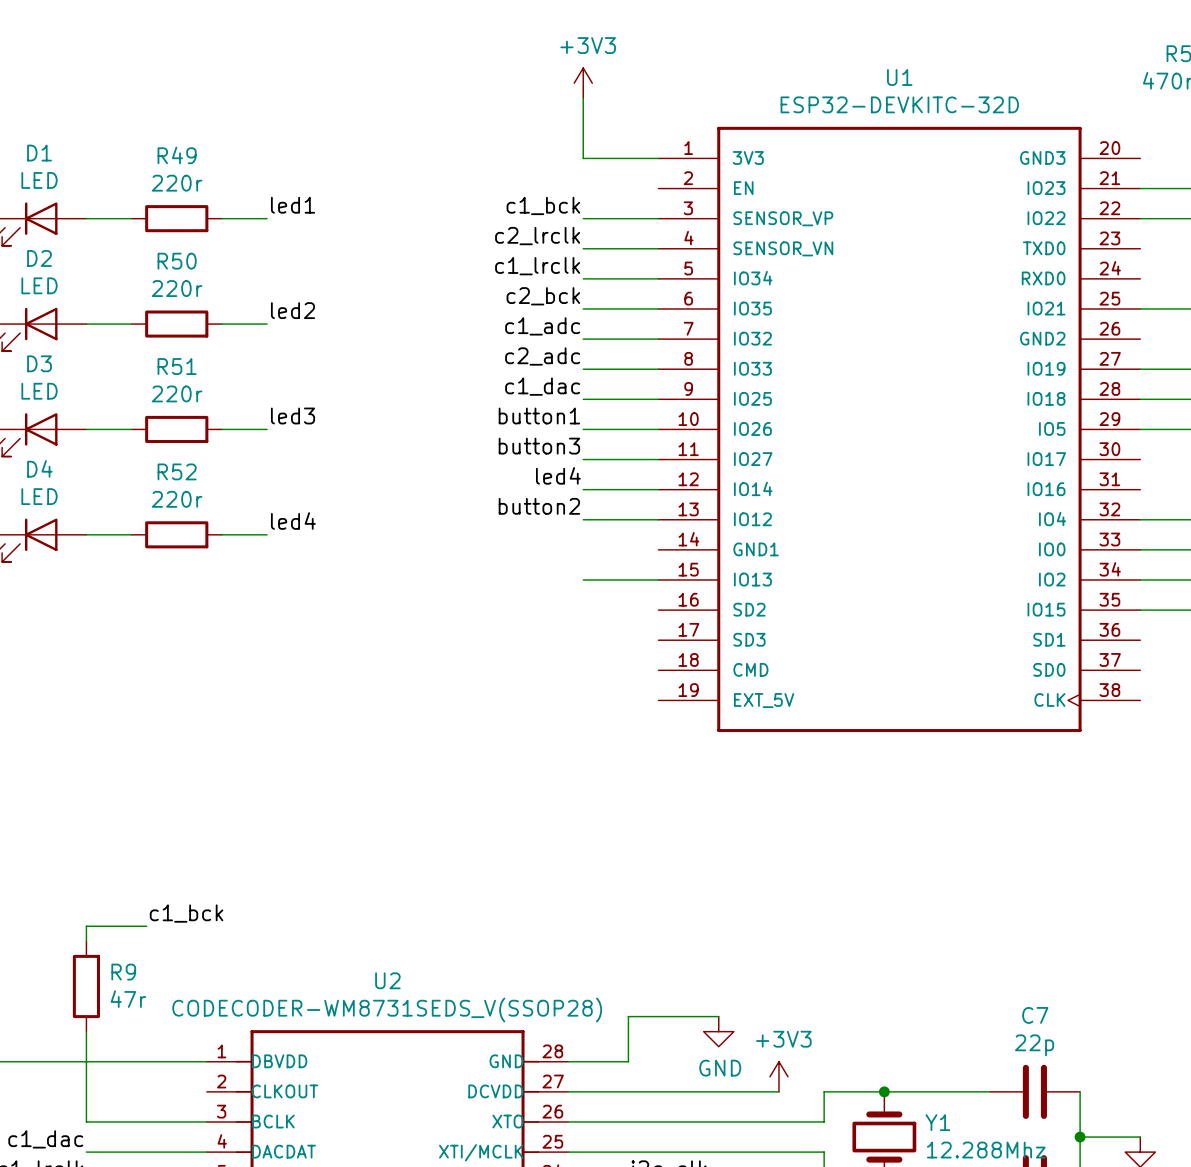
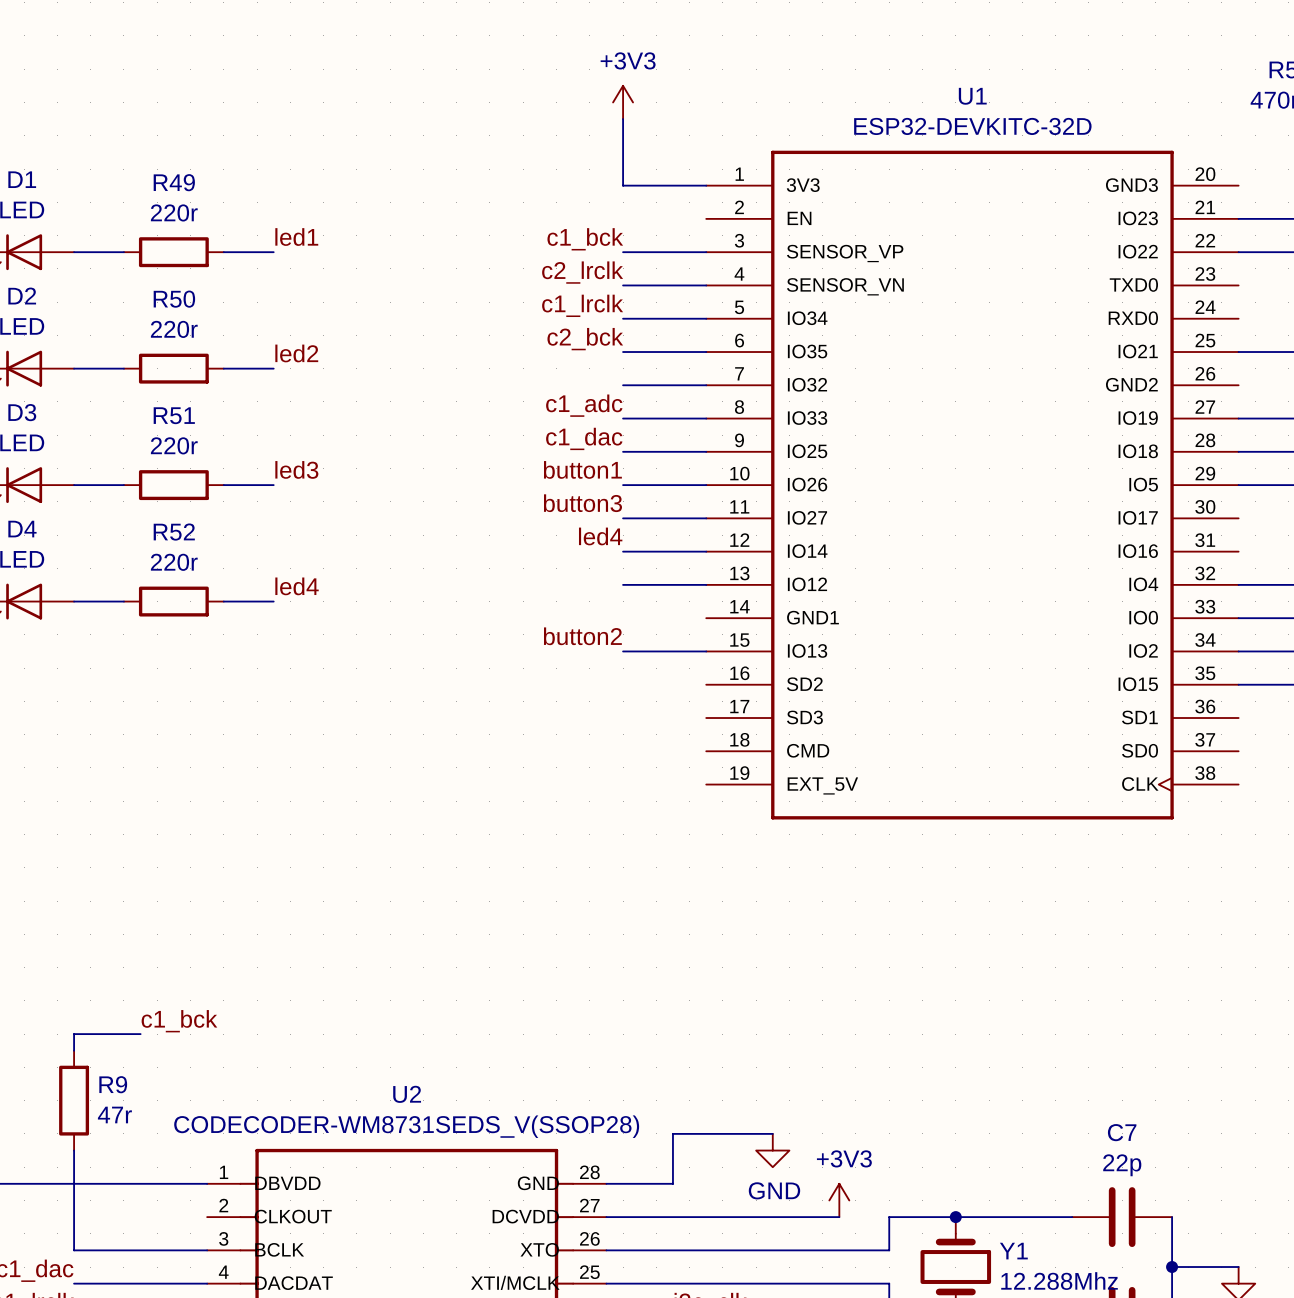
label: c1_adc (542, 326) -> none
label: c2_adc (542, 356) -> c1_adc (584, 405)
label position: button2 (539, 506) -> button2 (582, 636)

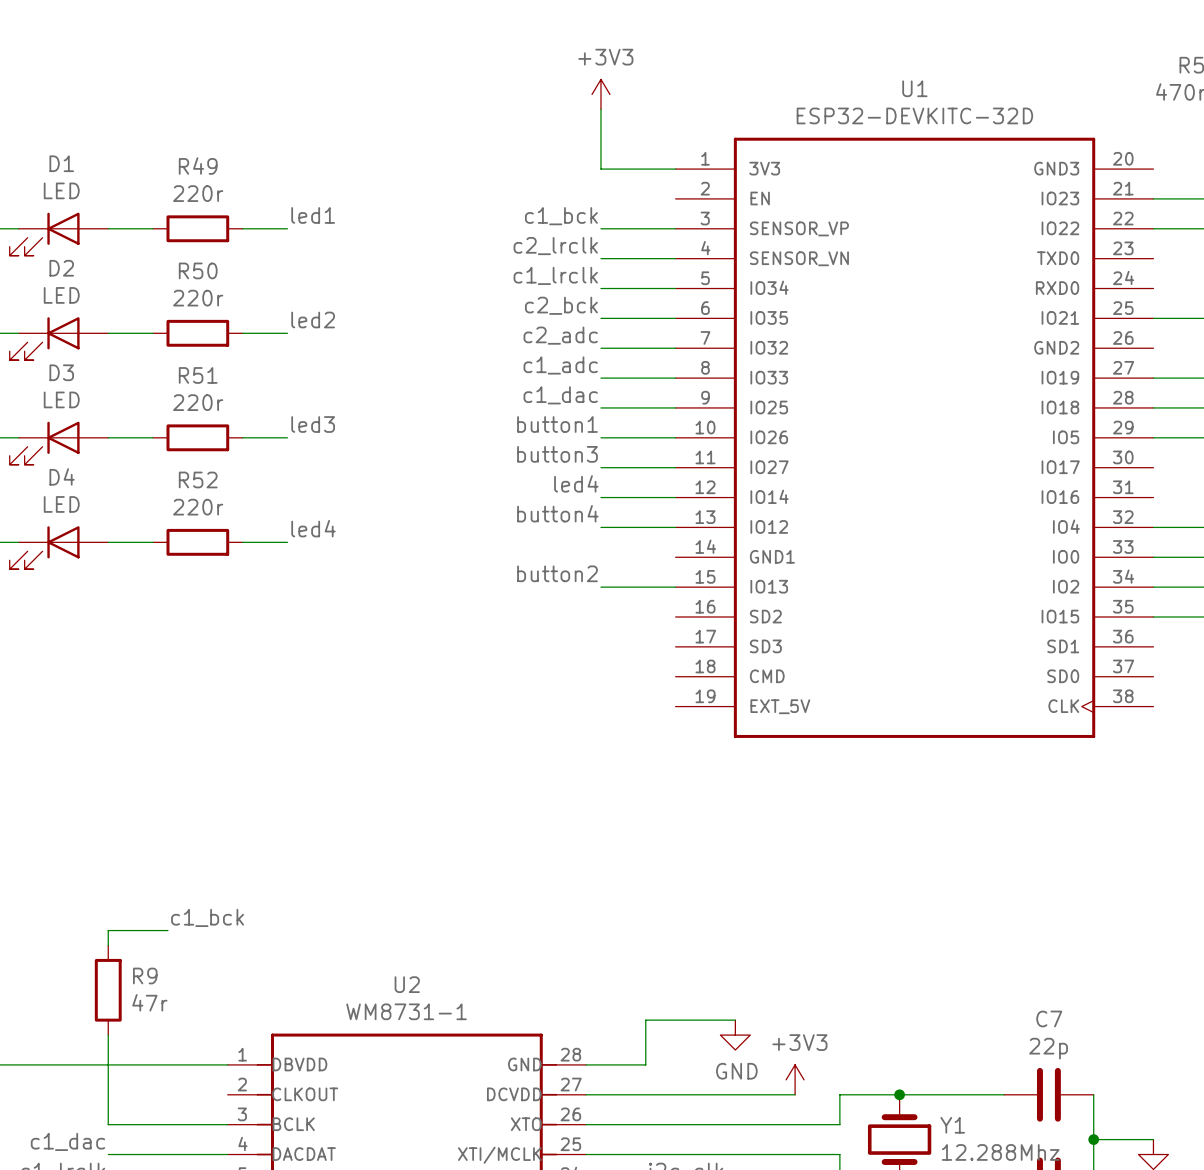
label: none -> c2_adc (560, 335)
label: none -> button4 (557, 513)
U2 value: CODECODER-WM8731SEDS_V(SSOP28) (406, 1126) -> WM8731-1 (406, 1011)

